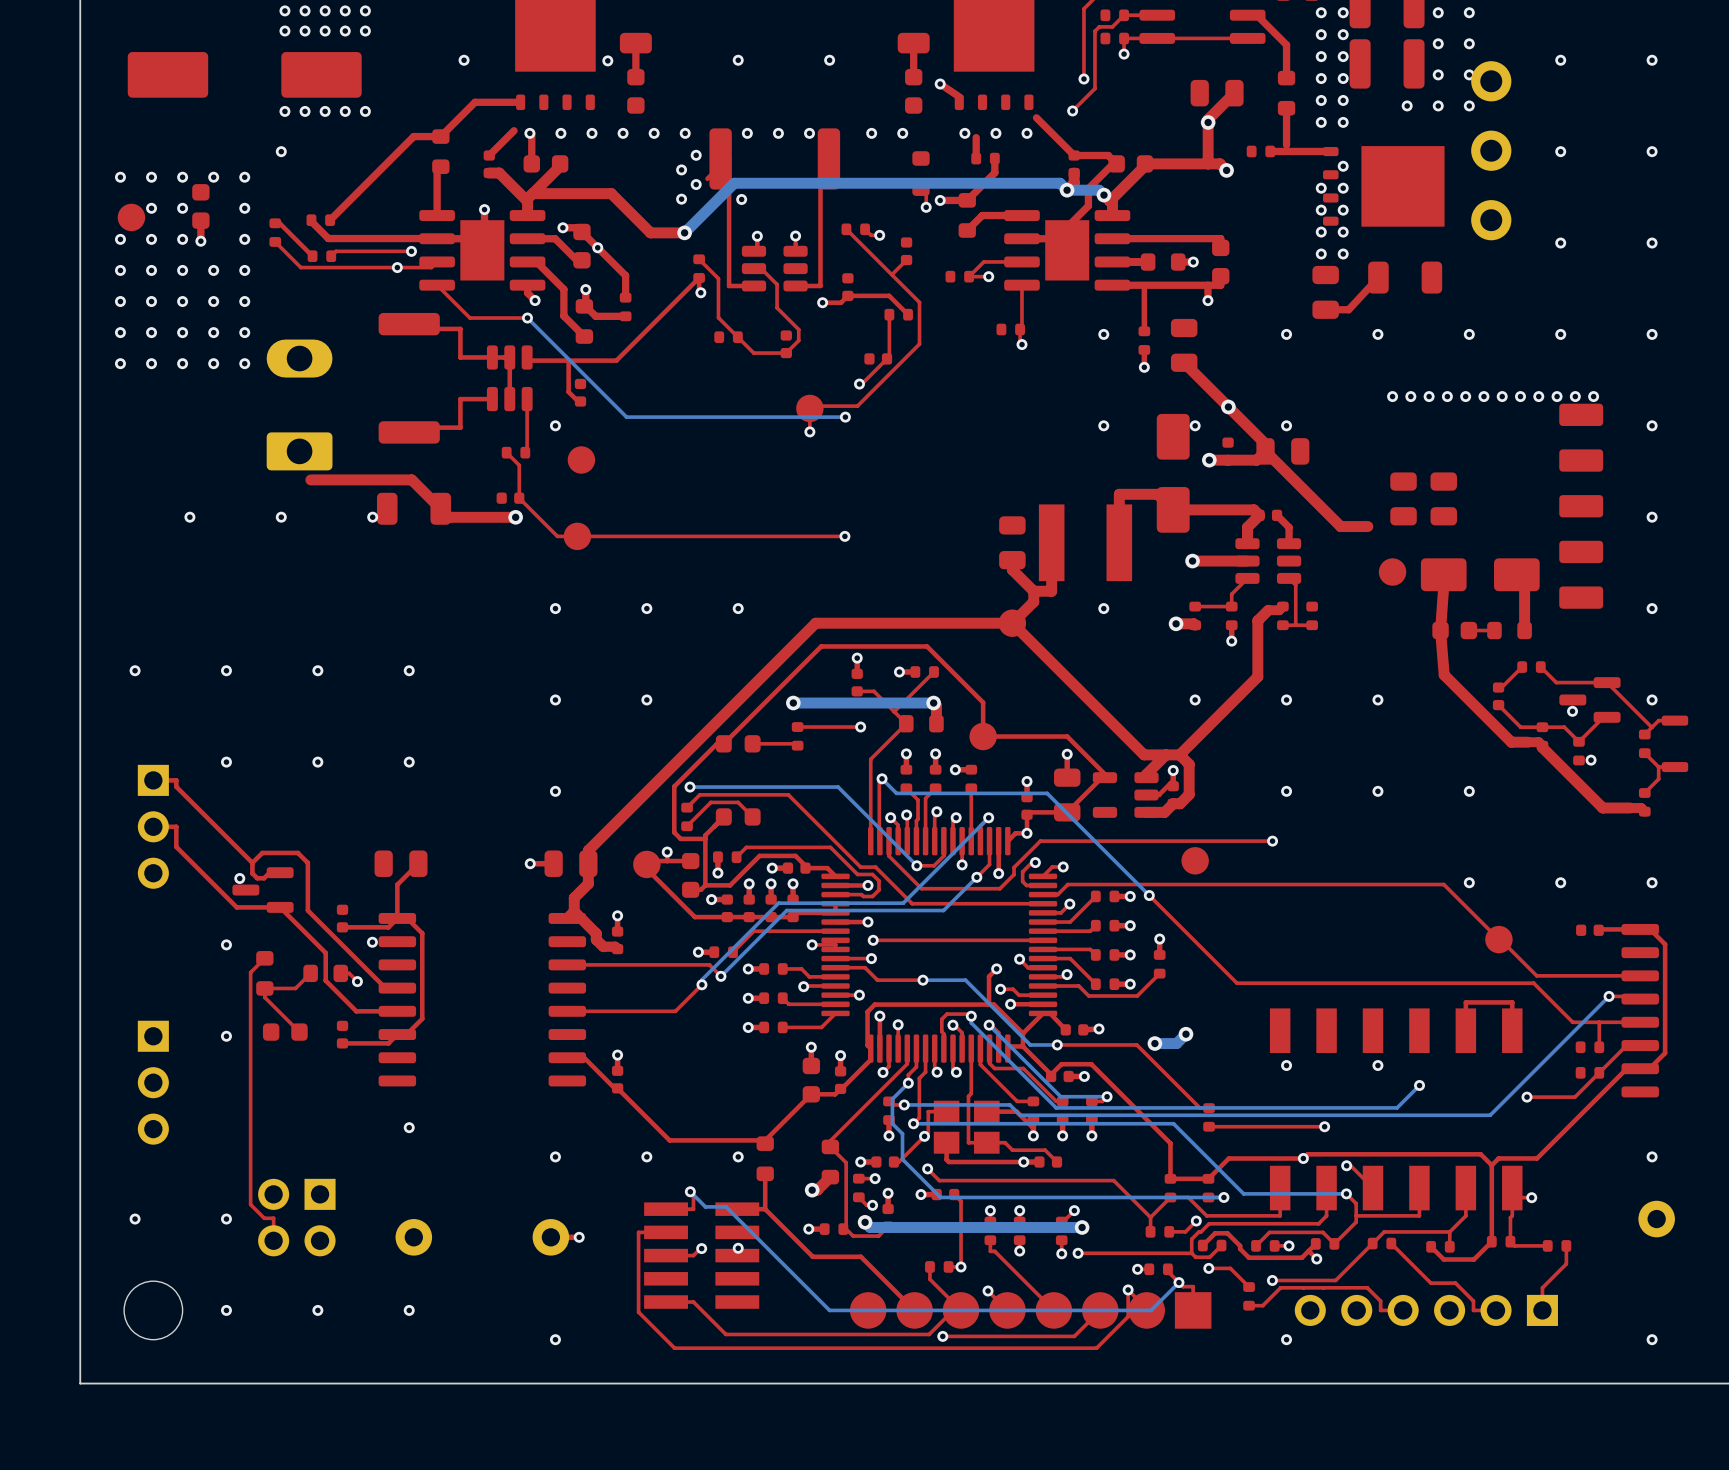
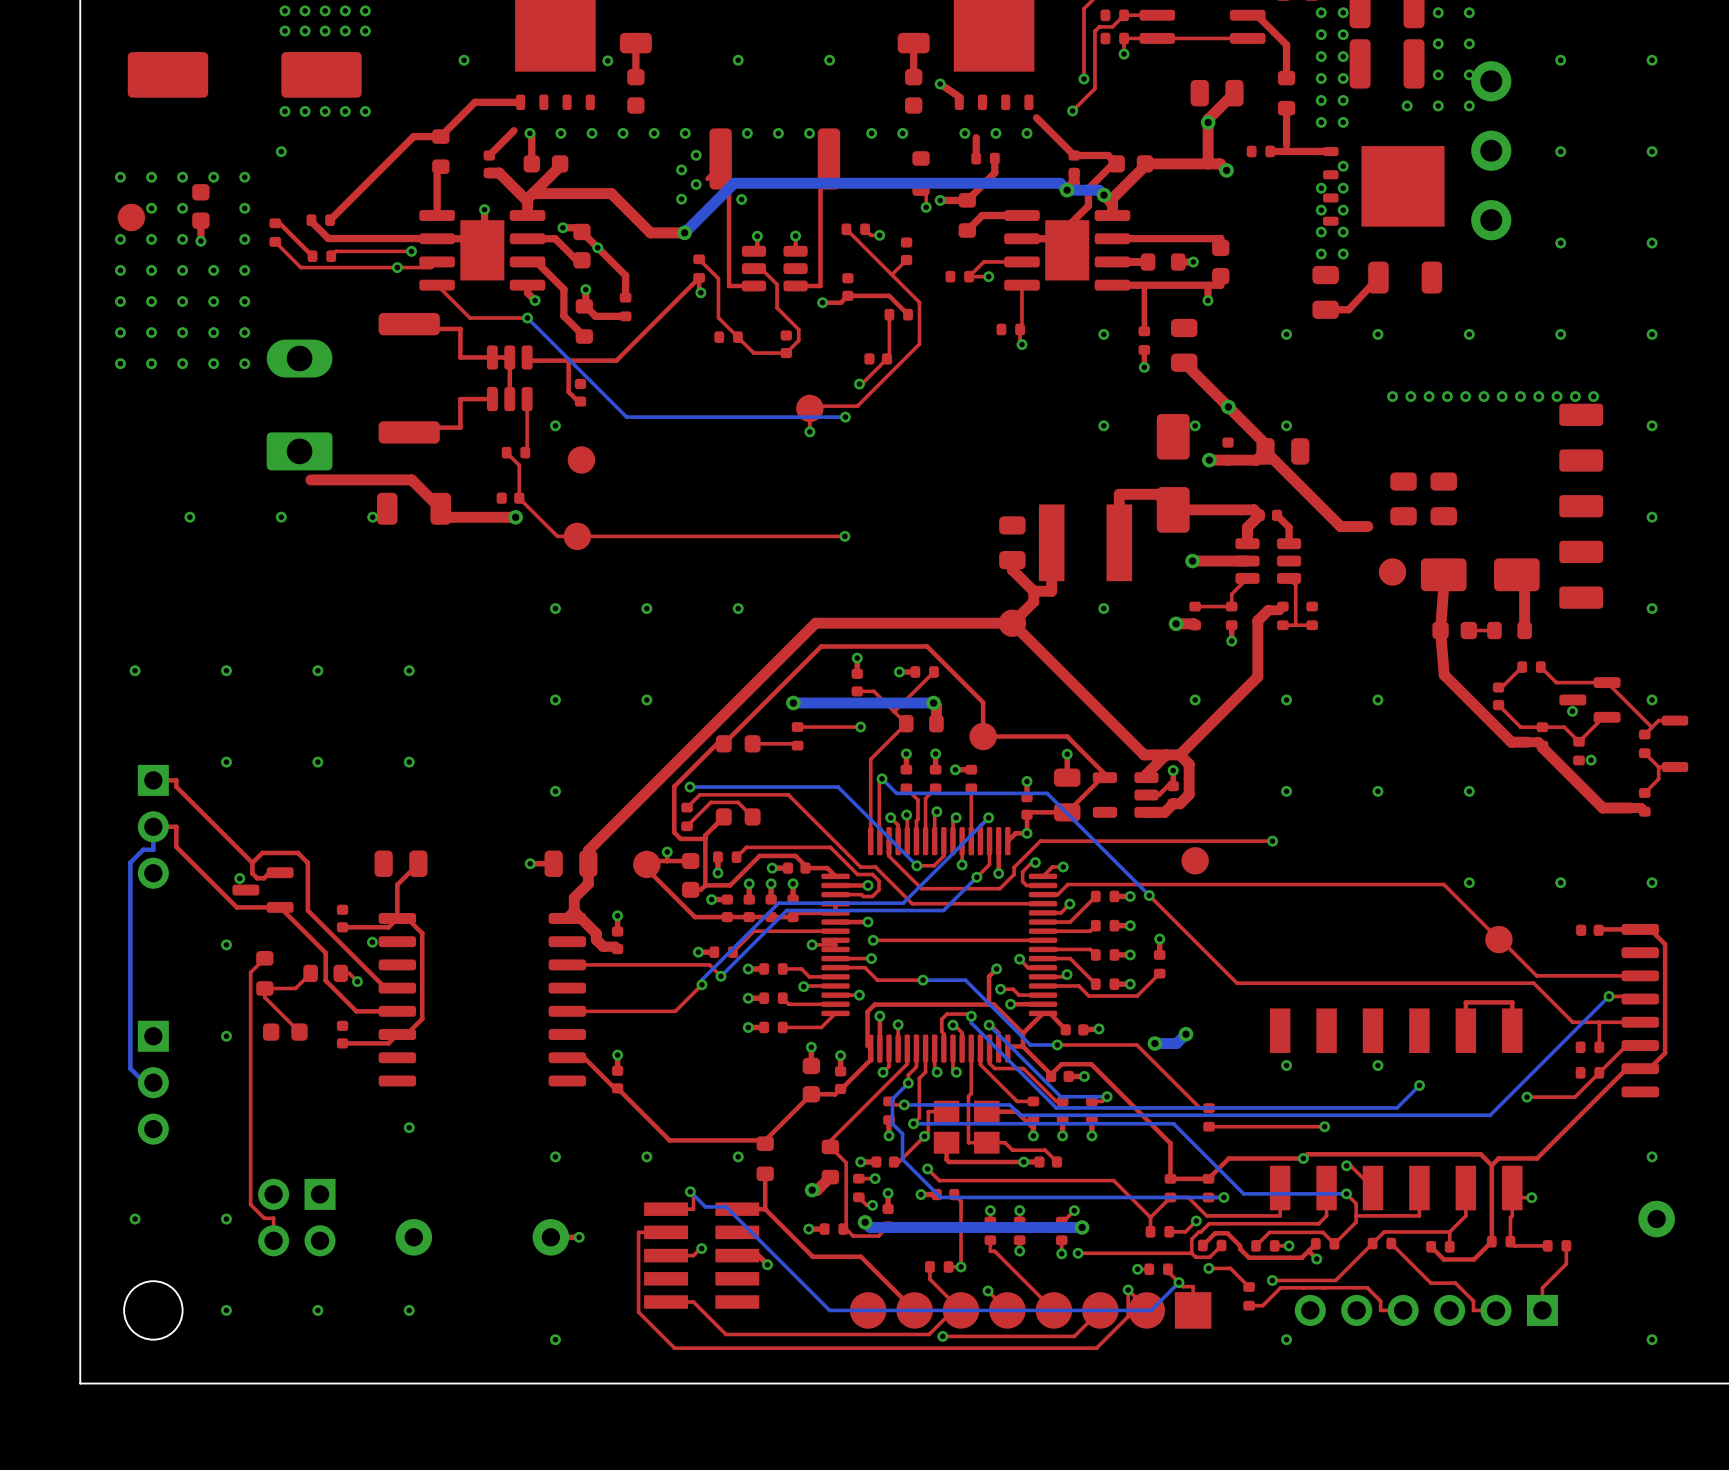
bottom track: none -> (153, 826) (153, 849) (143, 849) (130, 862) (130, 1068) (153, 1091)
via position: (738, 1248) -> (767, 1264)
top track: none -> (758, 1255) (767, 1264)

